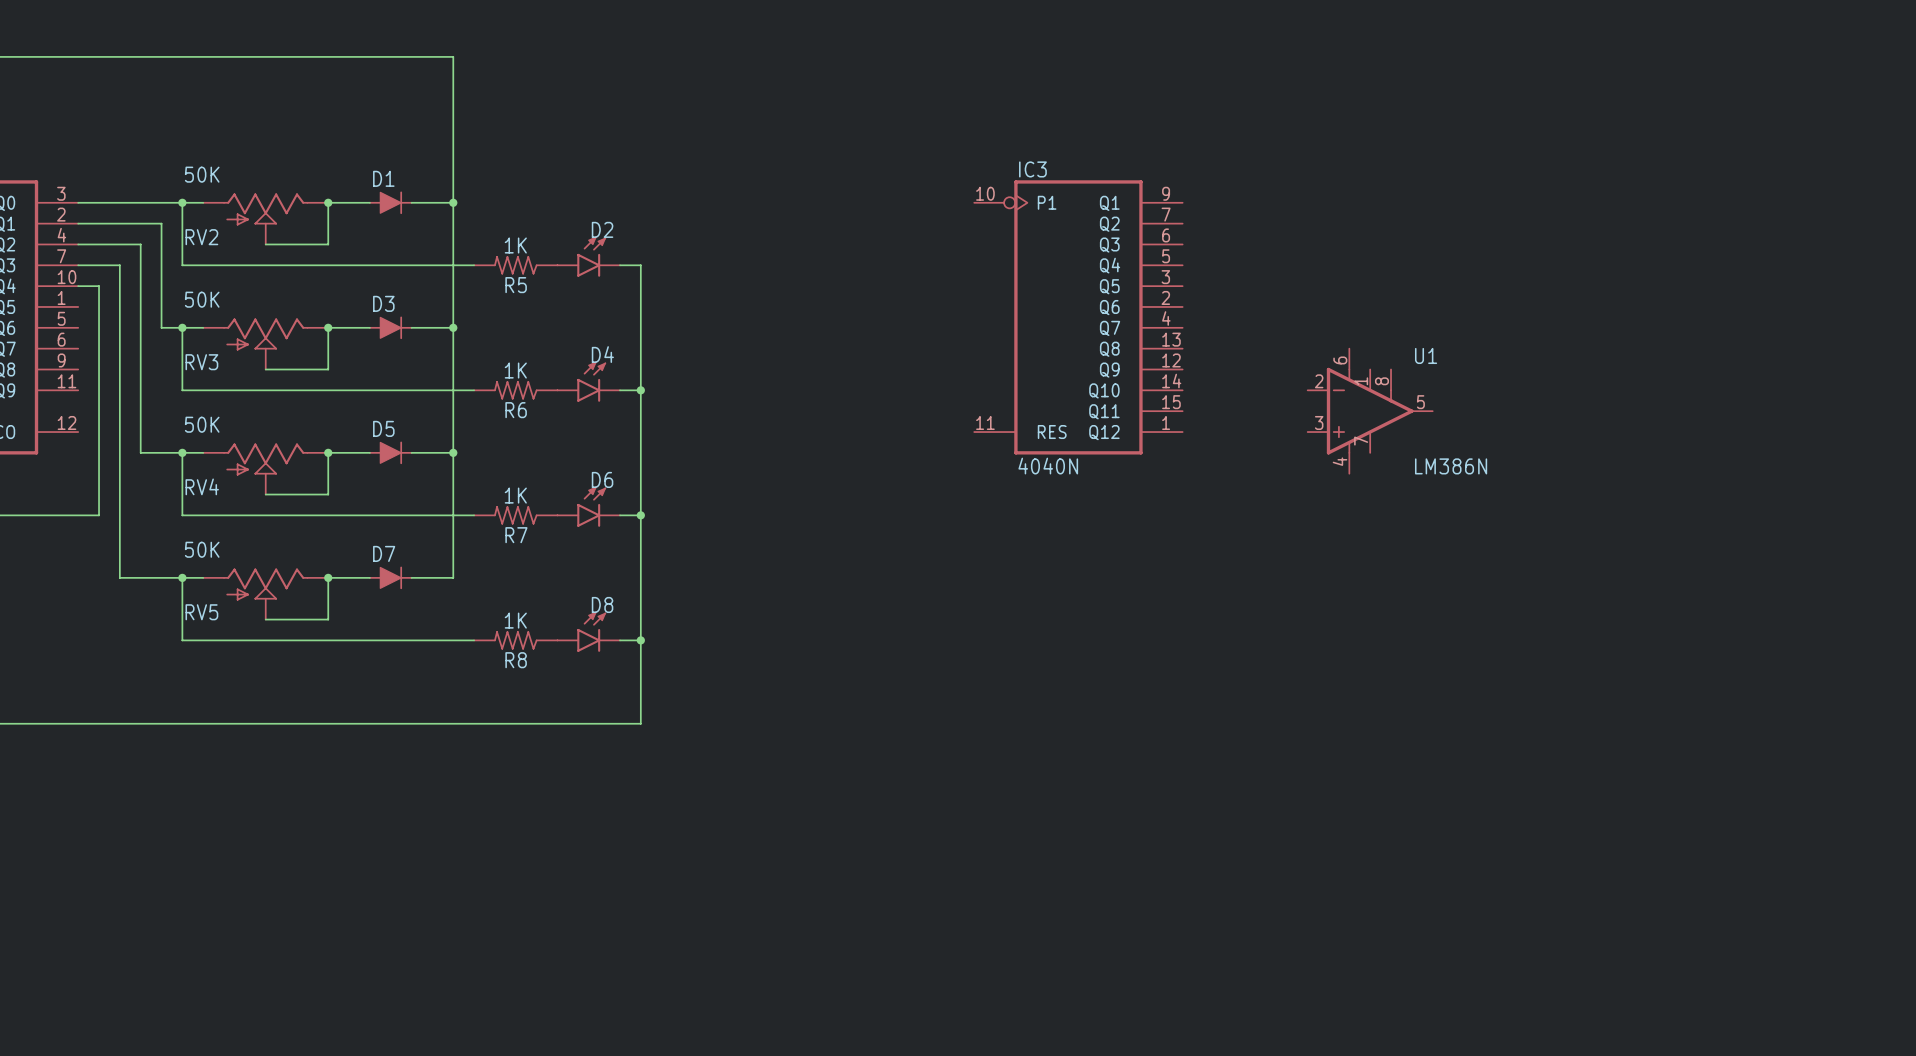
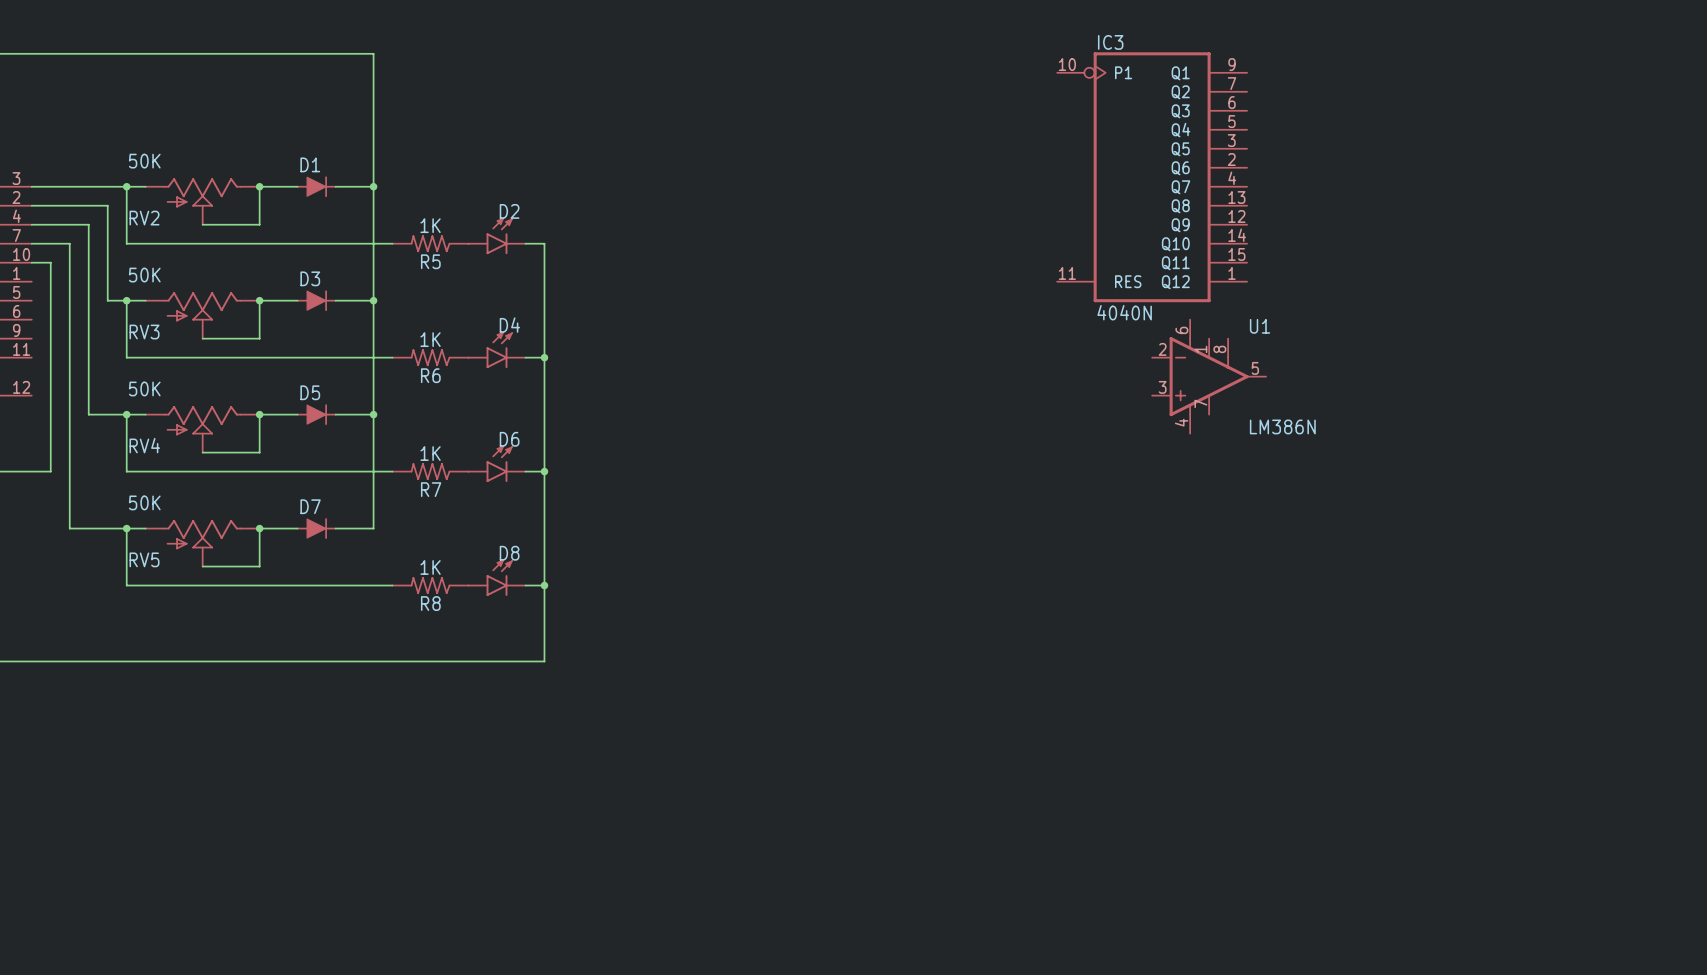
IC3 position: (1078, 317) -> (1152, 177)

